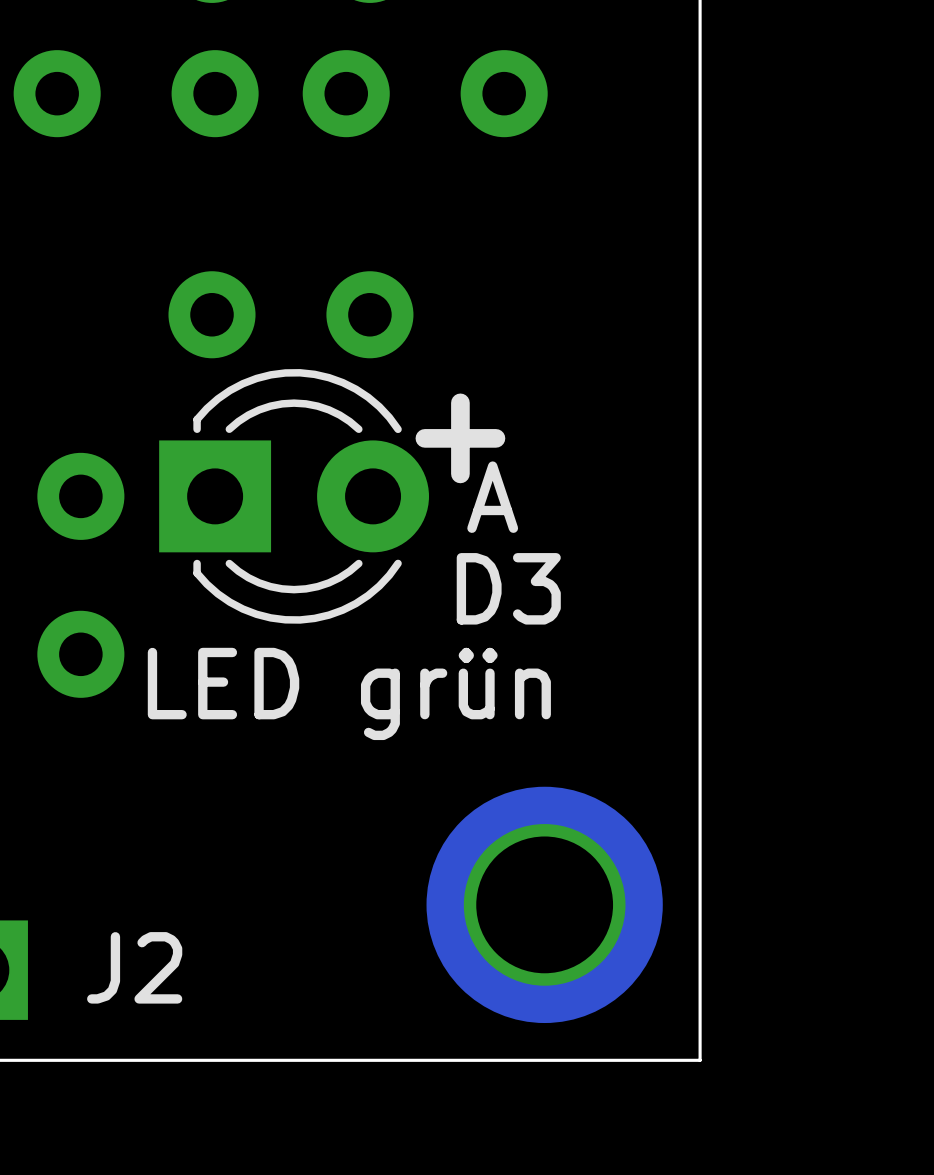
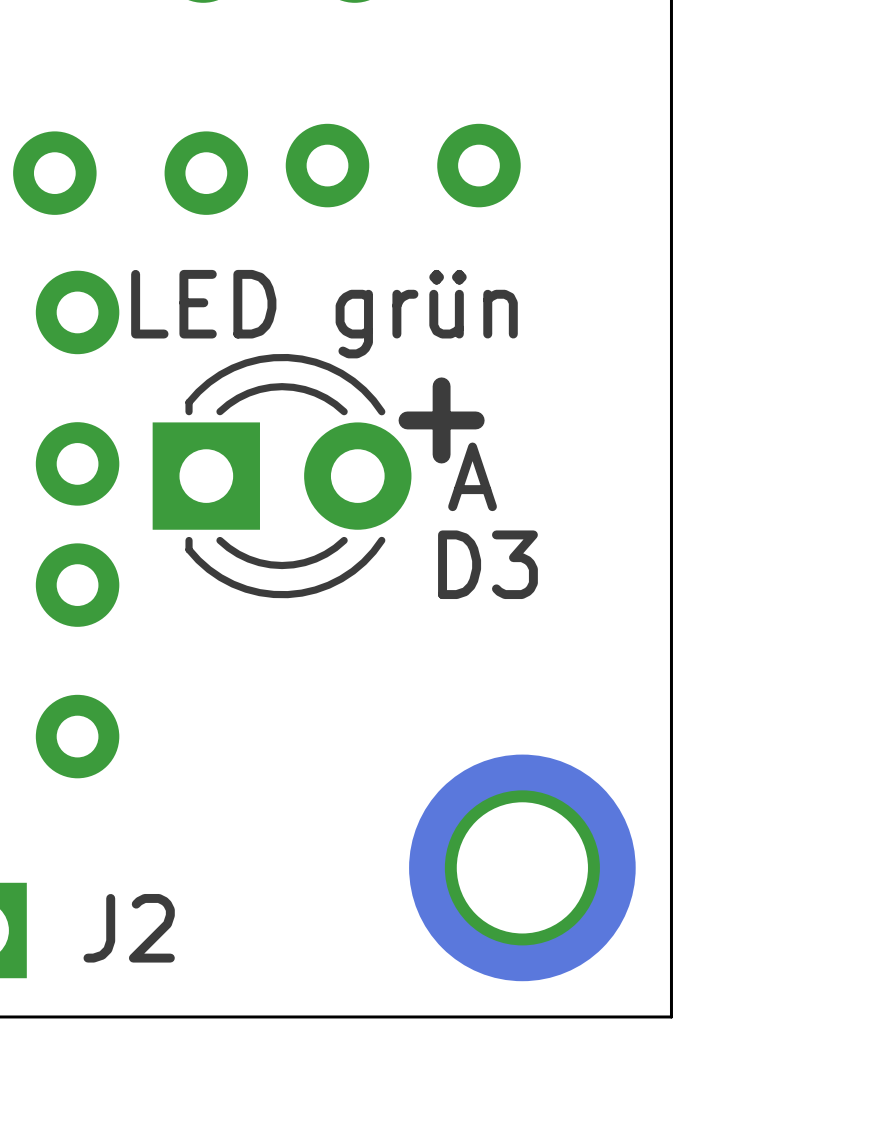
part position: (136, 93) -> (130, 173)
part position: (425, 93) -> (403, 165)
part: (290, 314) -> none
part: none -> (77, 388)
part: (80, 575) -> none
part: none -> (77, 660)
text position: LED grün (349, 693) -> LED grün (324, 314)

